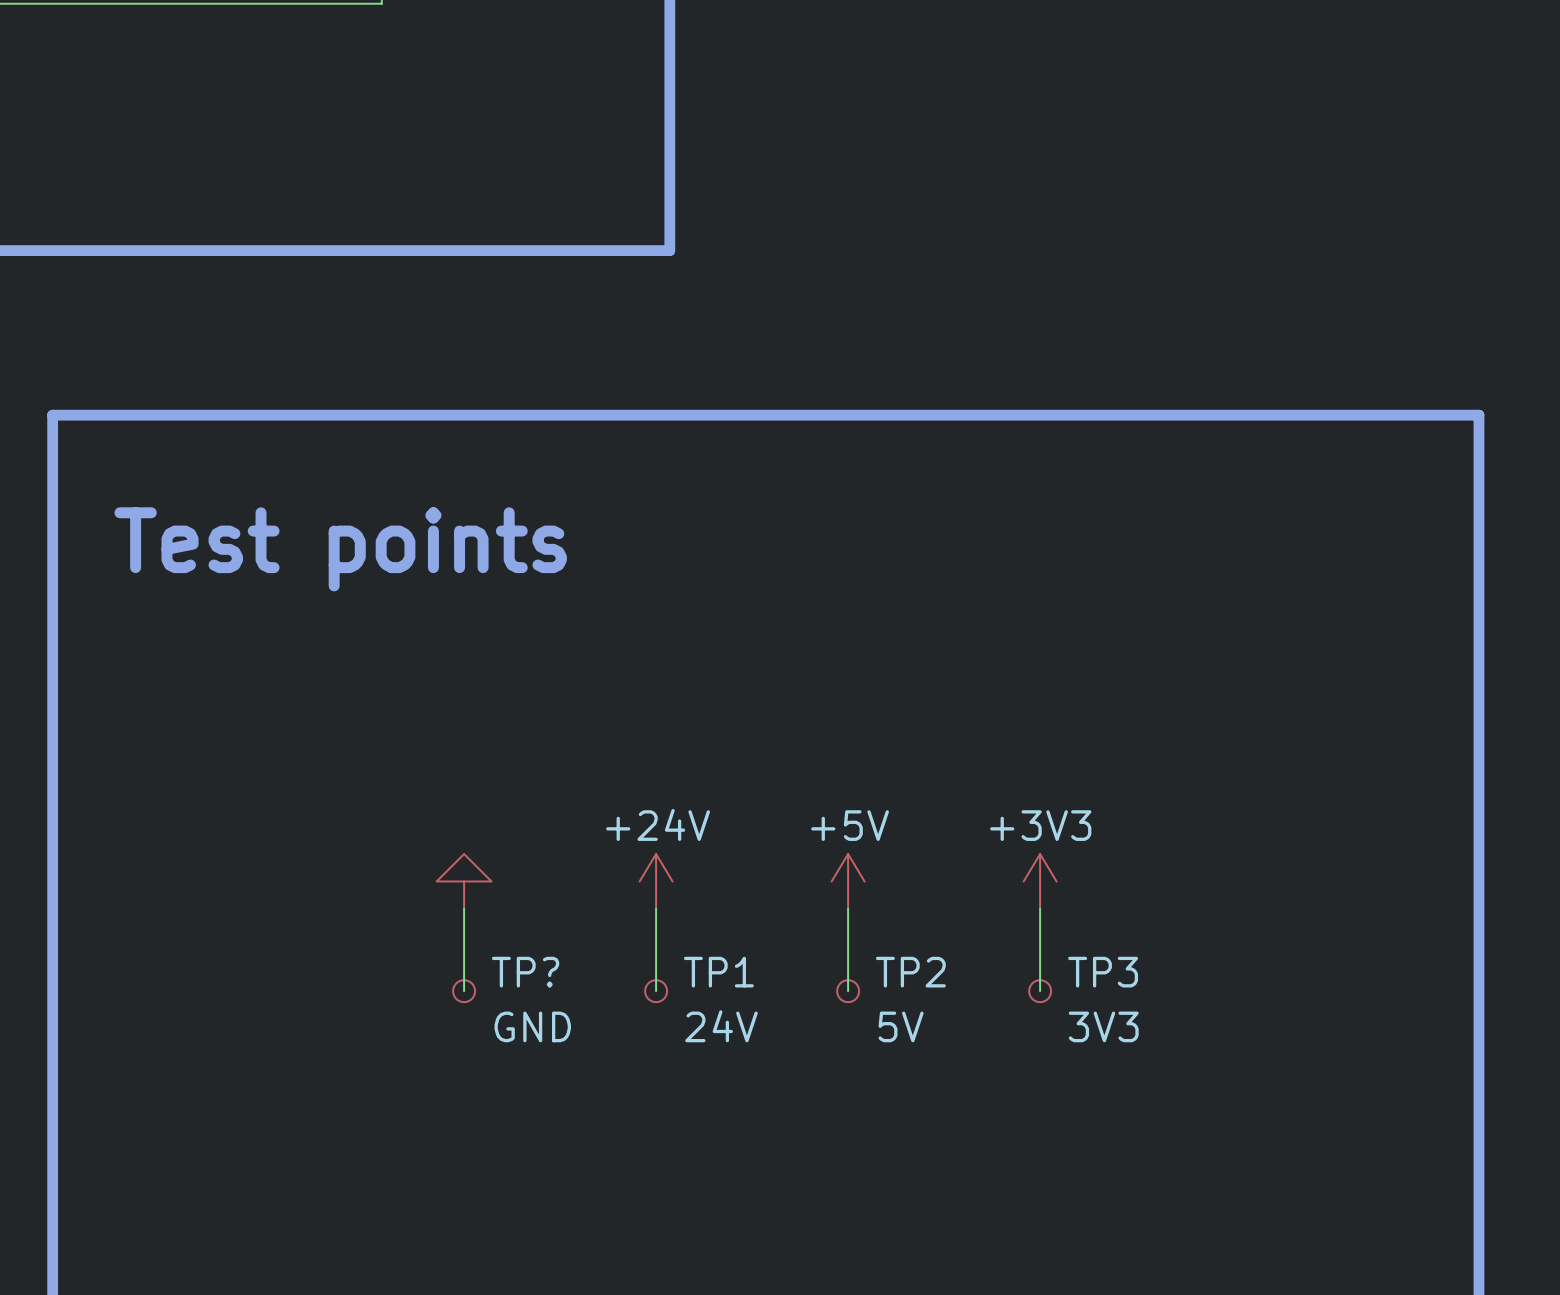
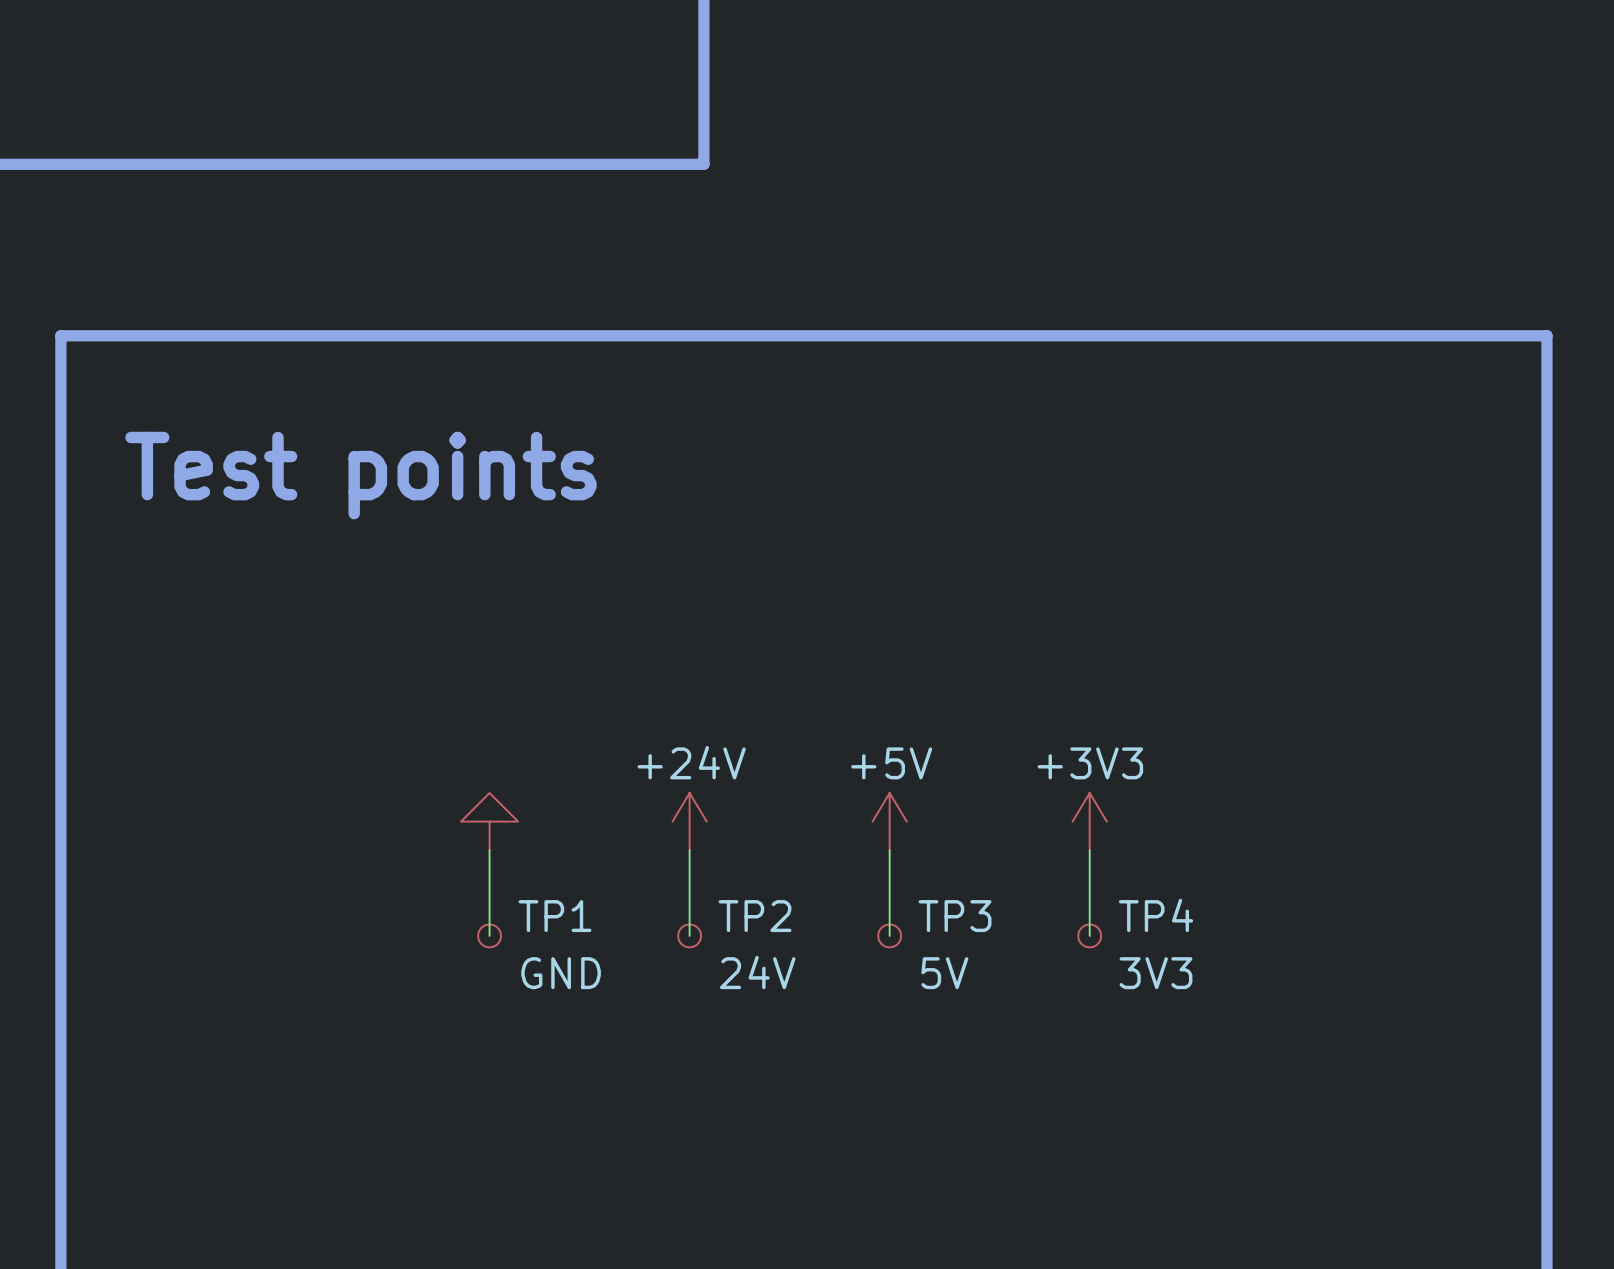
TP? name: TP? (525, 972) -> TP1 (554, 916)
TP1 name: TP1 (718, 972) -> TP2 (755, 916)
TP2 name: TP2 (910, 972) -> TP3 (955, 916)
TP3 name: TP3 (1103, 972) -> TP4 (1156, 915)

